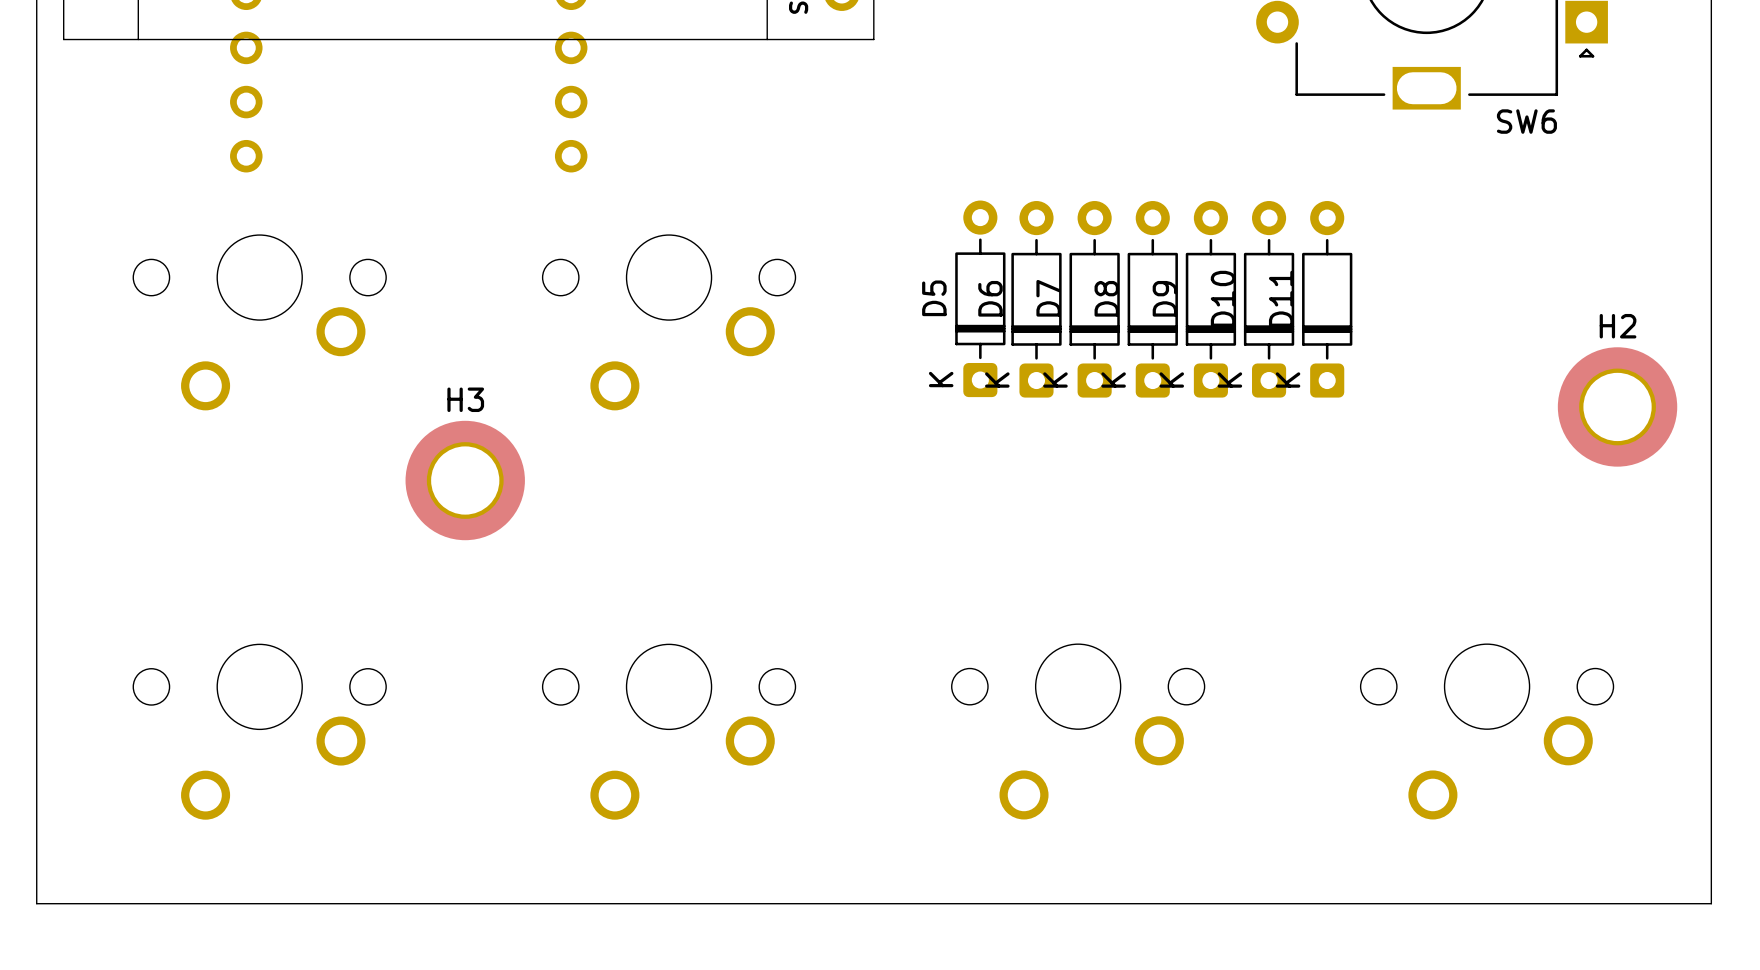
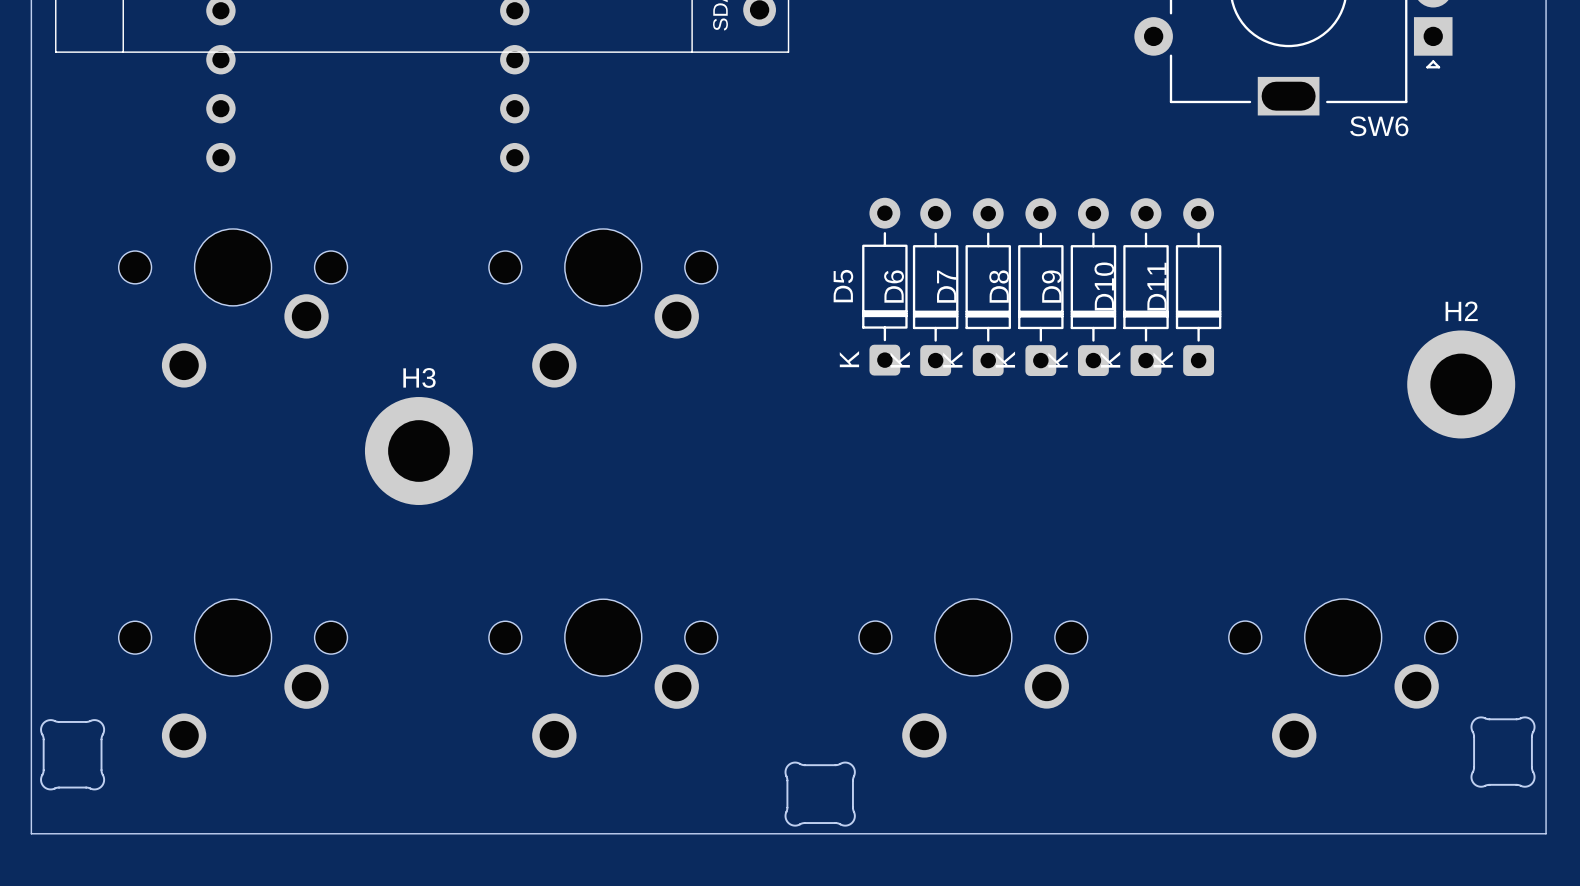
part: none -> (1503, 752)
part: none -> (72, 754)
part: none -> (820, 794)

